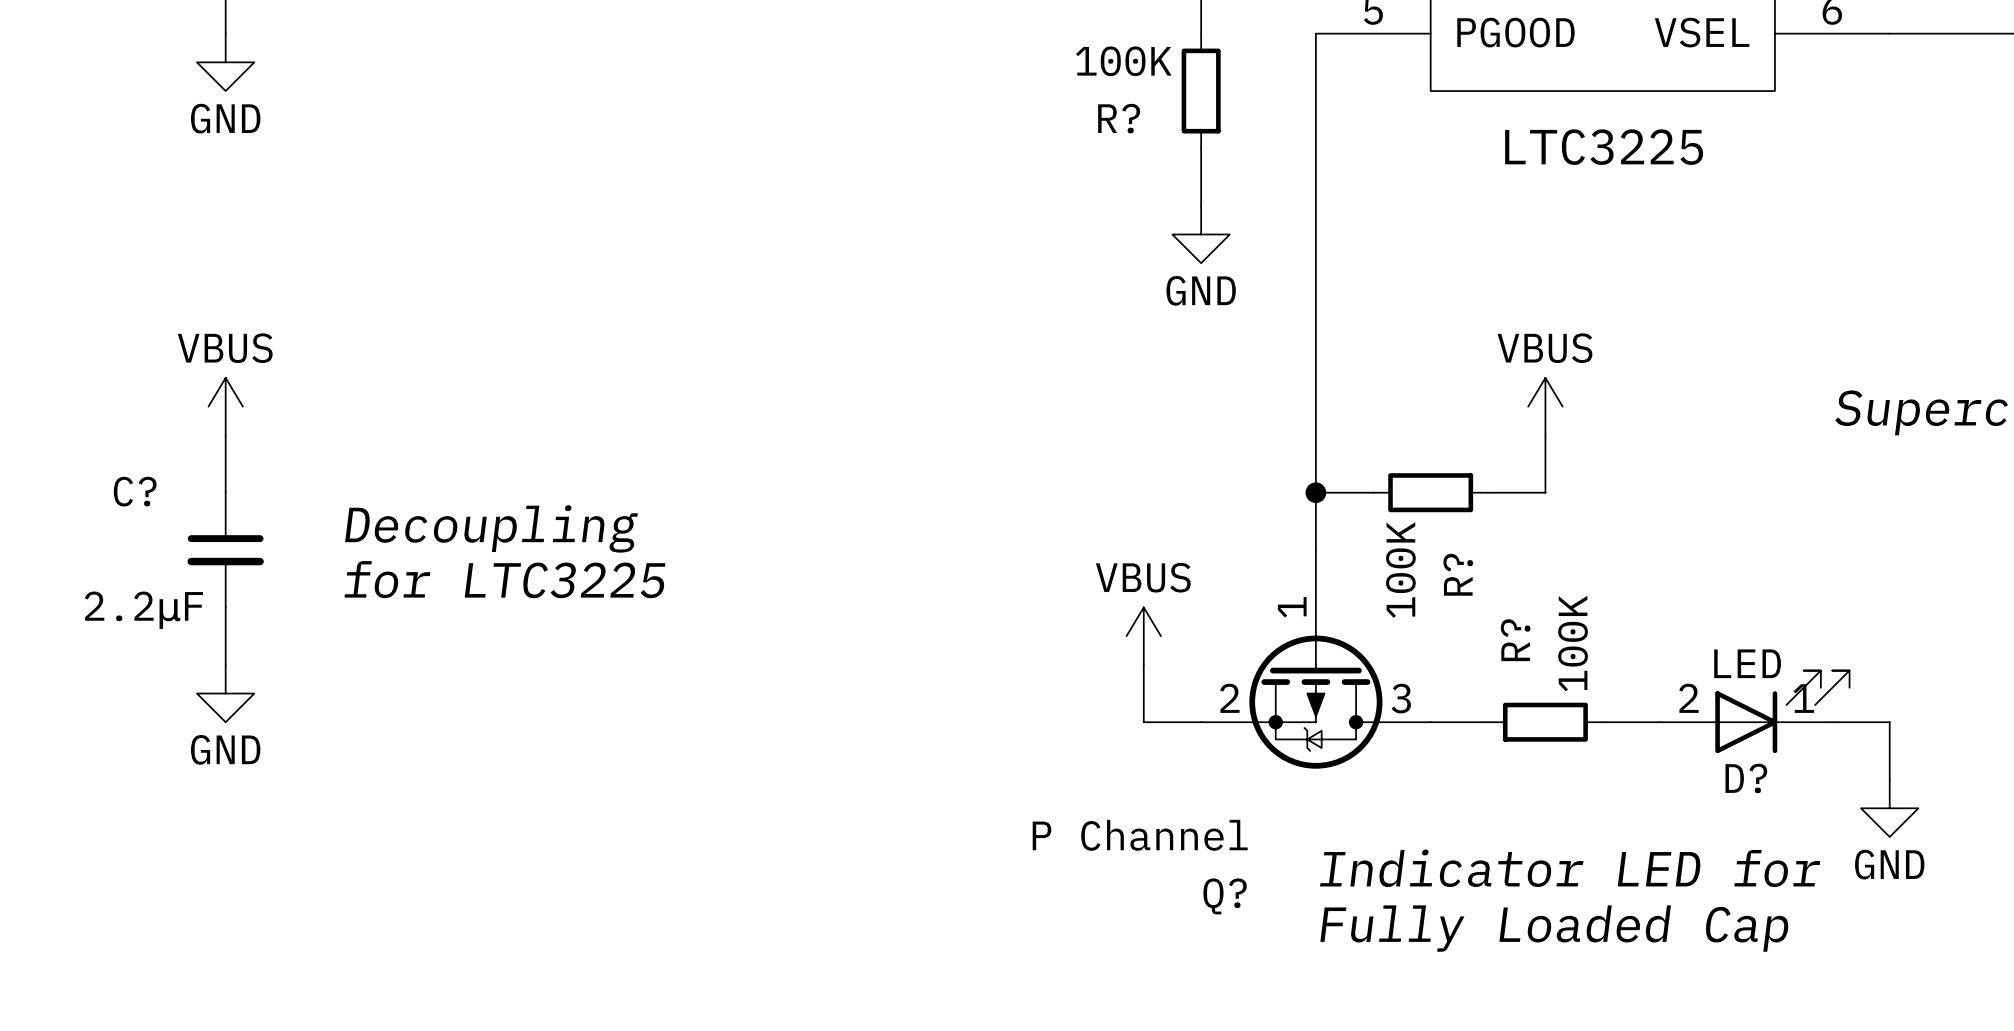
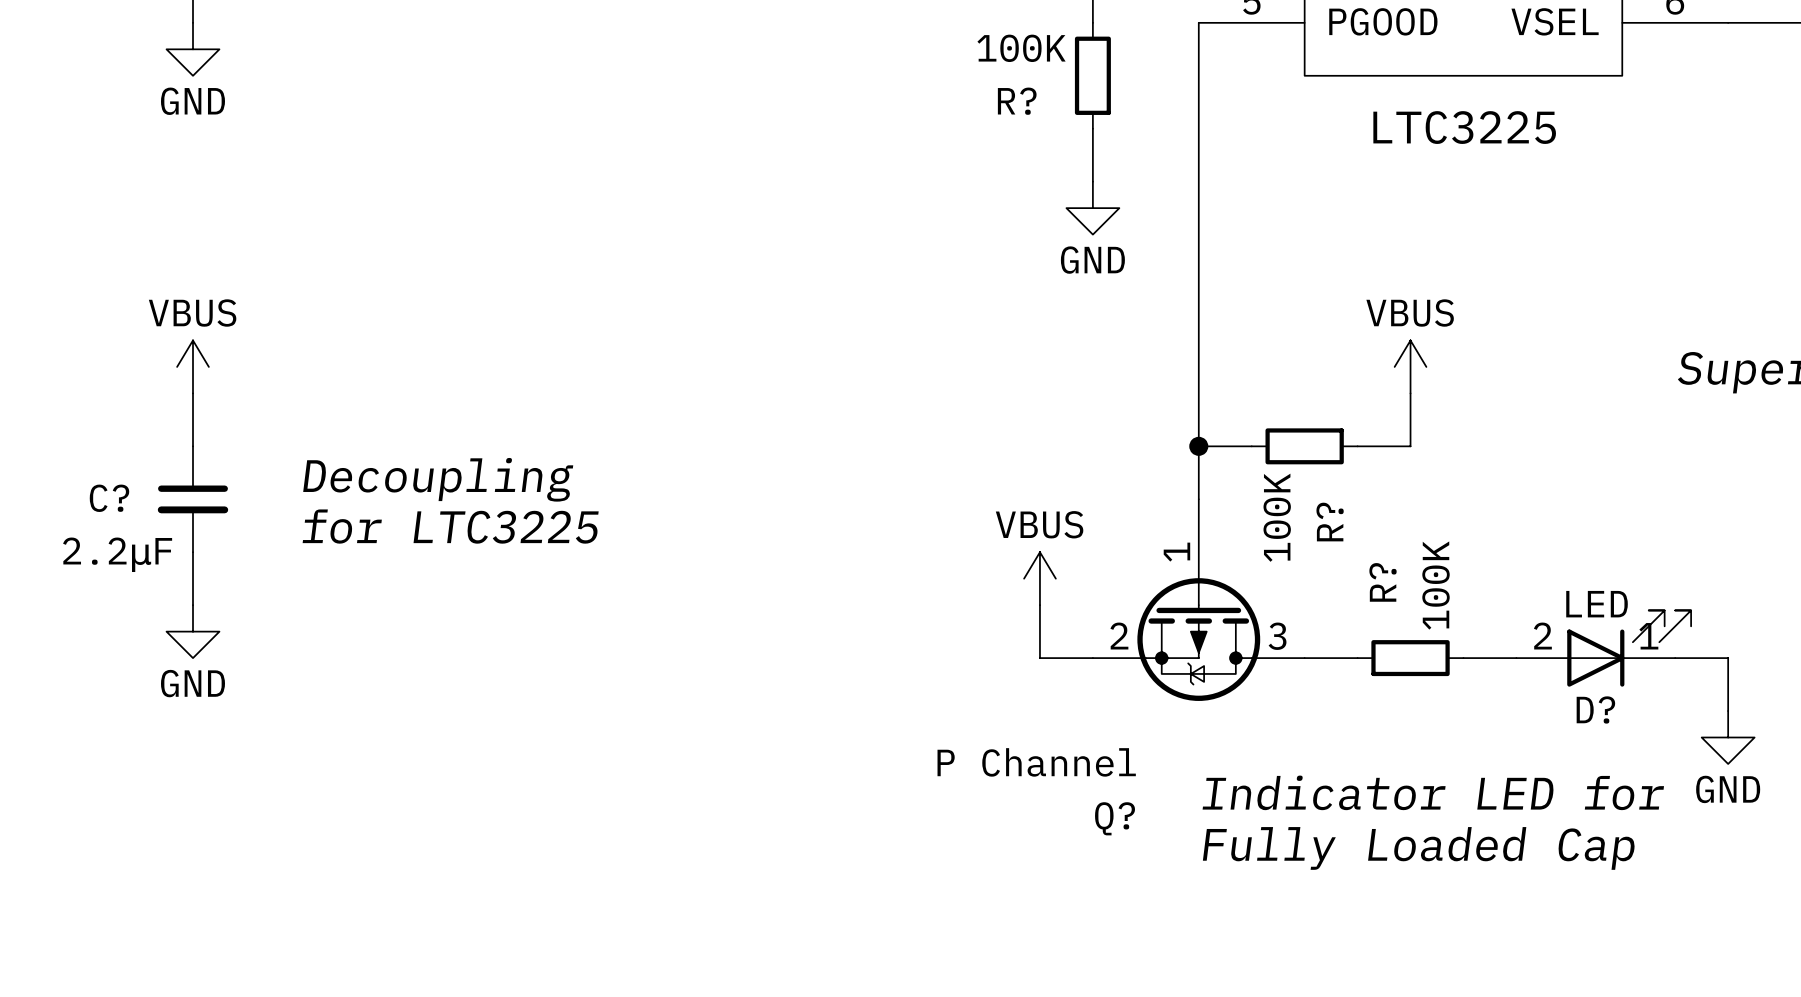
C? name position: C? (135, 491) -> C? (109, 498)

